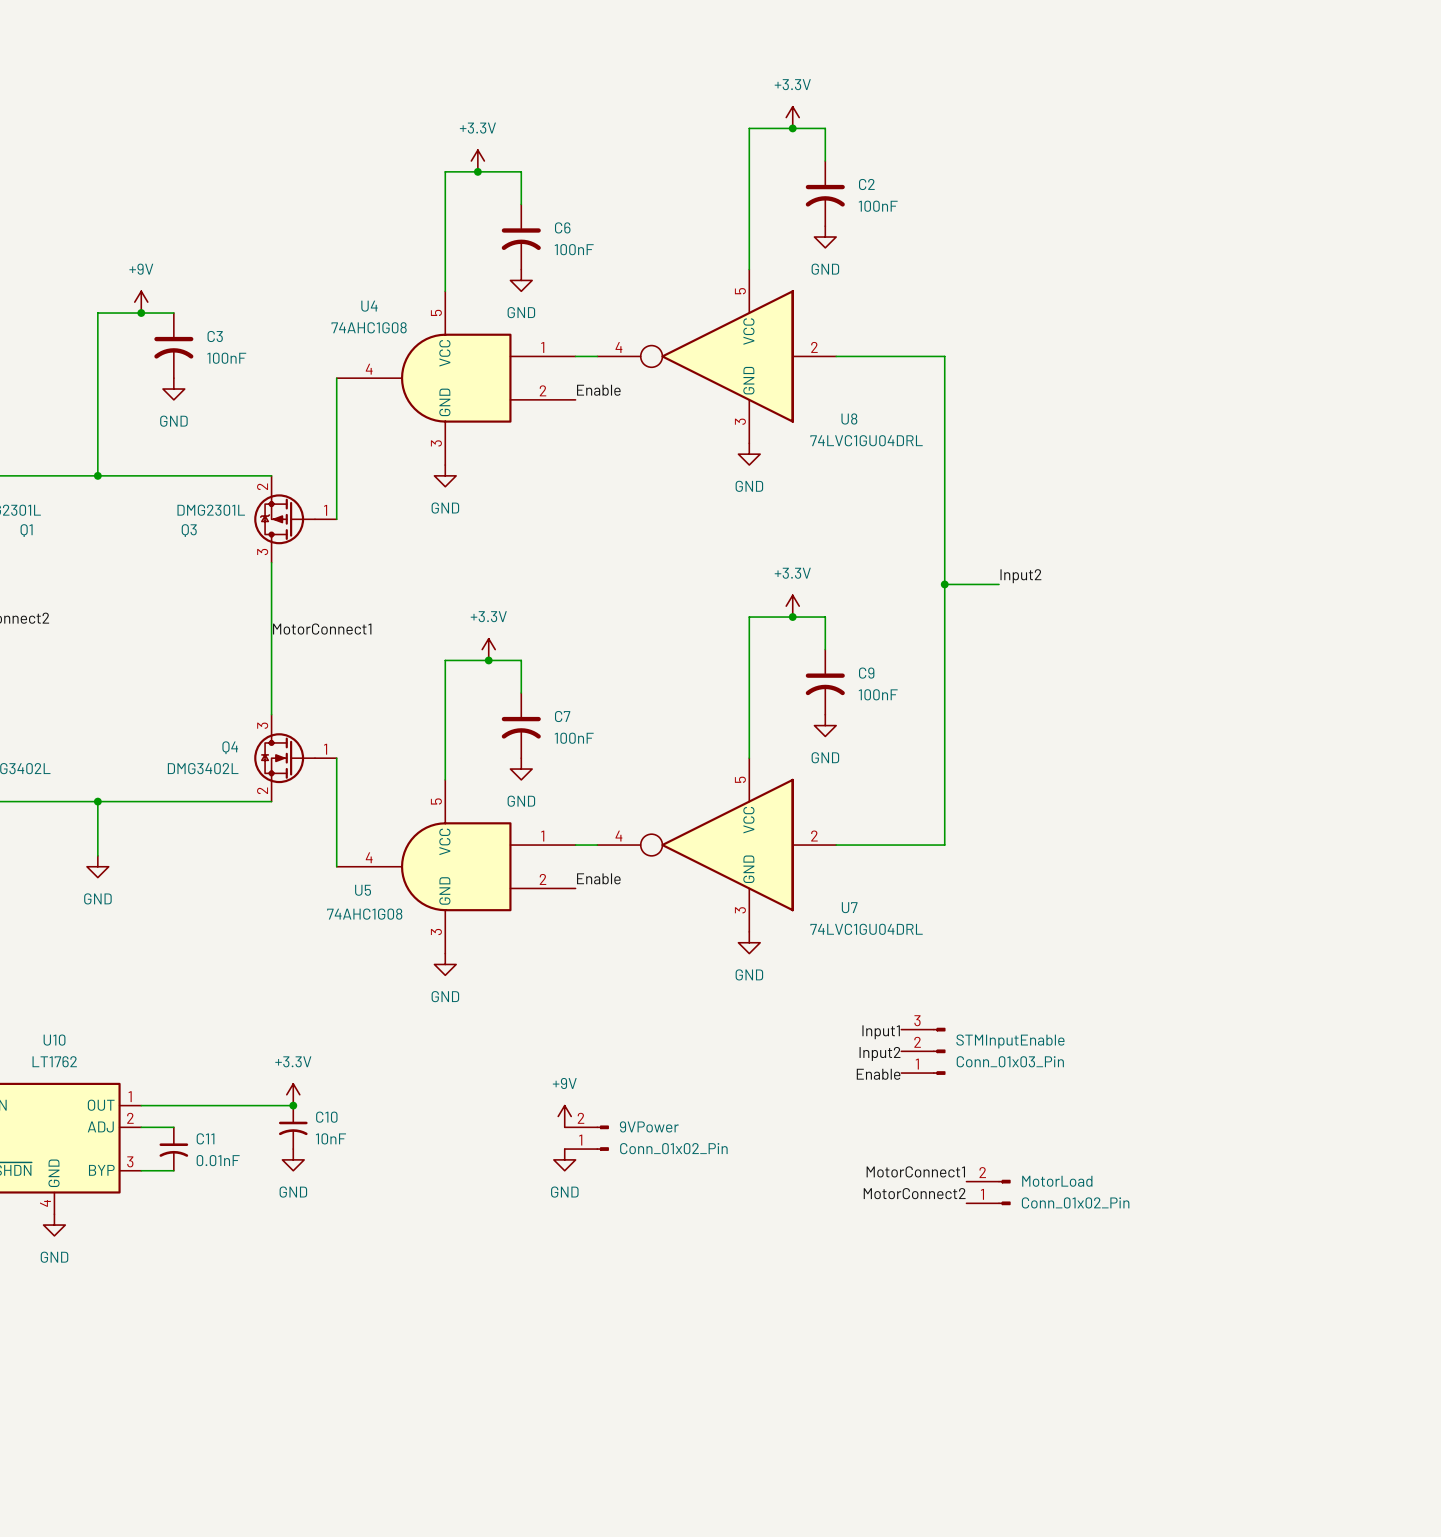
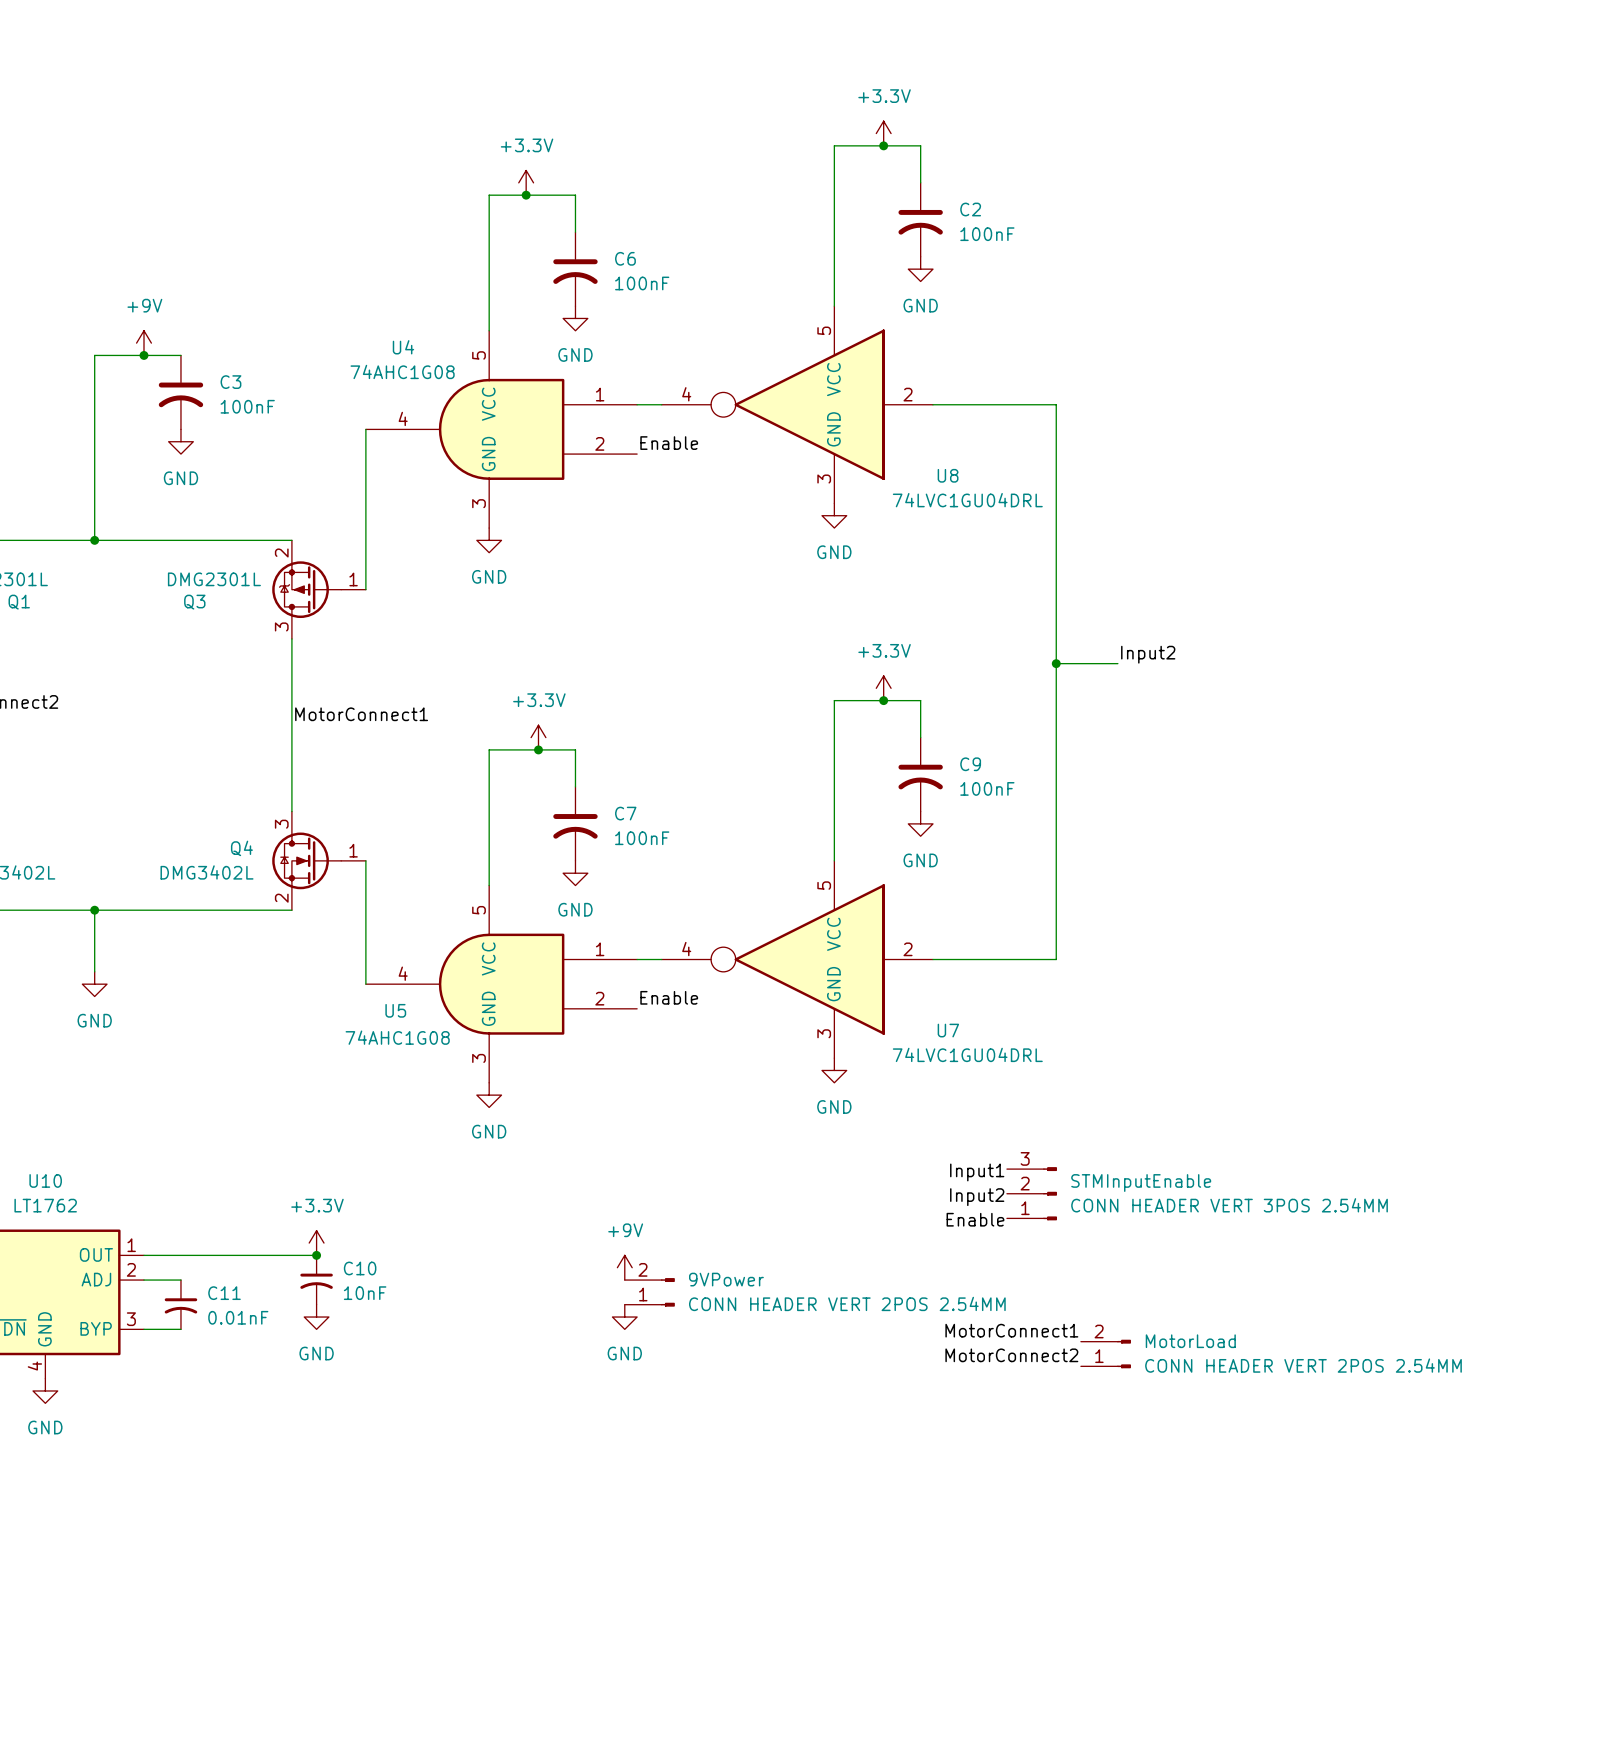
STMInputEnable value: Conn_01x03_Pin (1010, 1061) -> CONN HEADER VERT 3POS 2.54MM (1229, 1205)
9VPower value: Conn_01x02_Pin (673, 1148) -> CONN HEADER VERT 2POS 2.54MM (847, 1303)
MotorLoad value: Conn_01x02_Pin (1075, 1202) -> CONN HEADER VERT 2POS 2.54MM (1303, 1365)

